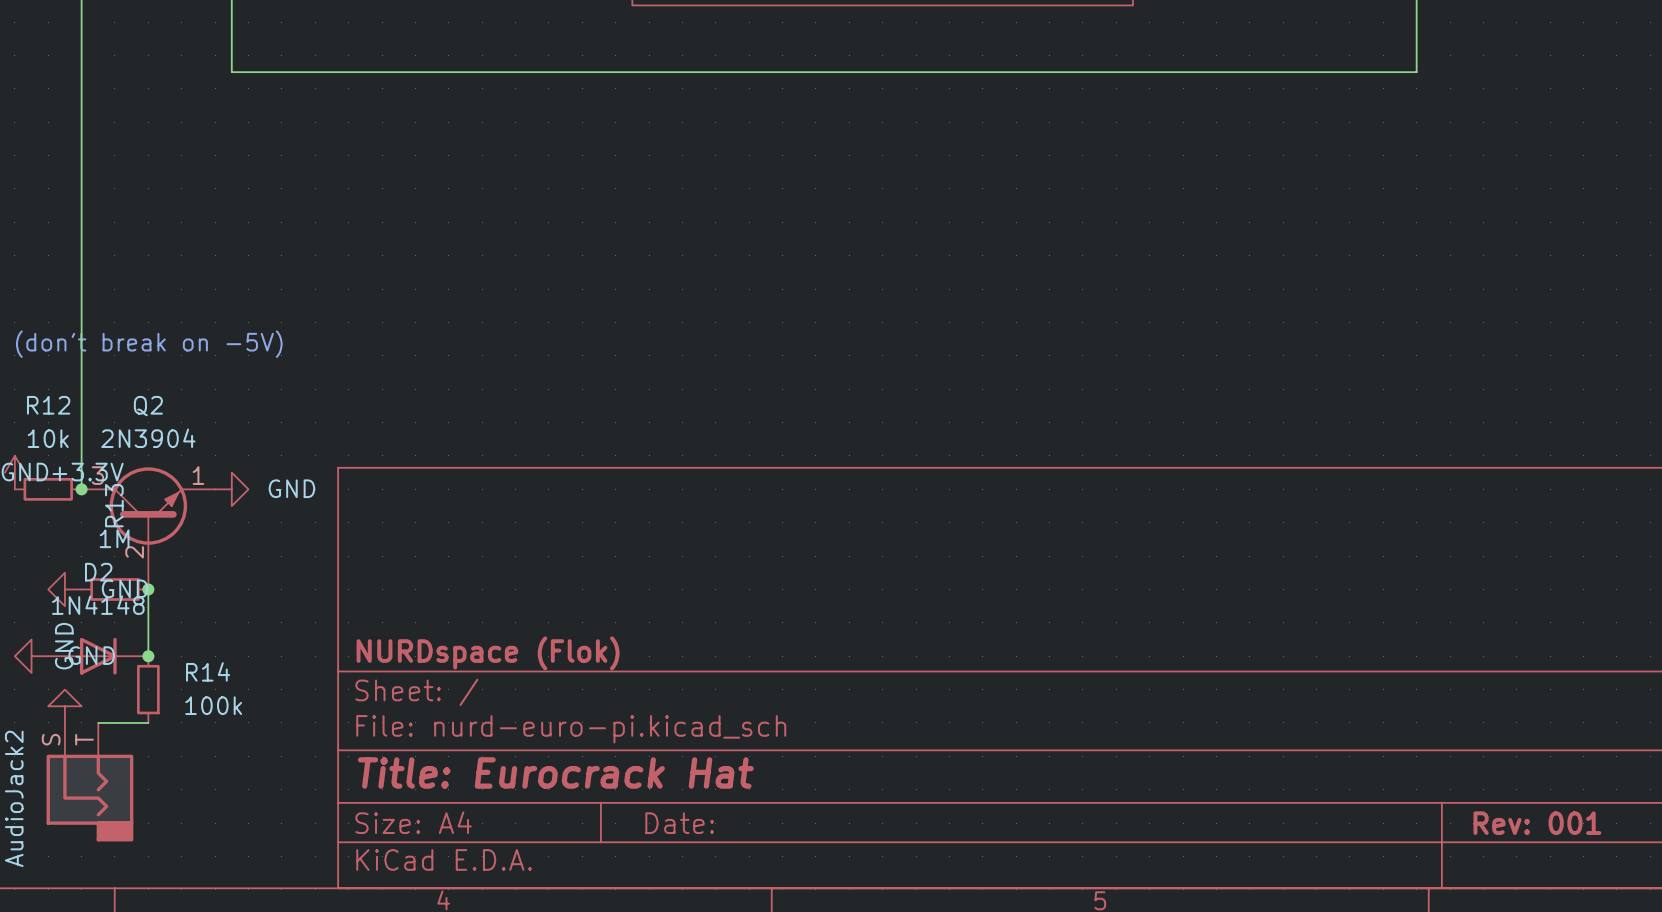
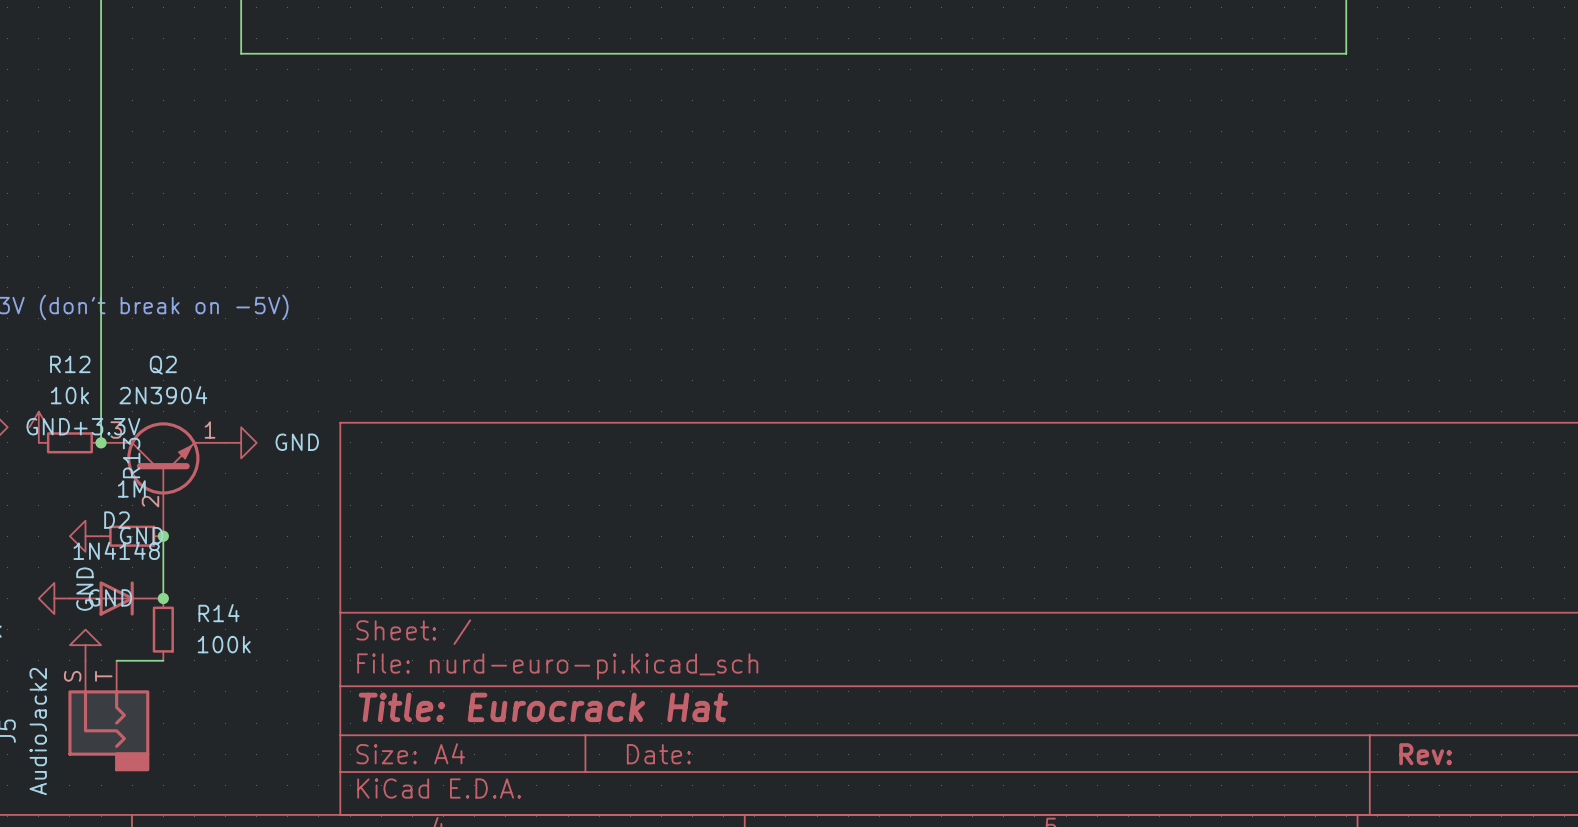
title block: NURDspace (Flok) (488, 653) -> none
title block: Rev: 001 (1537, 823) -> Rev: (1425, 754)

